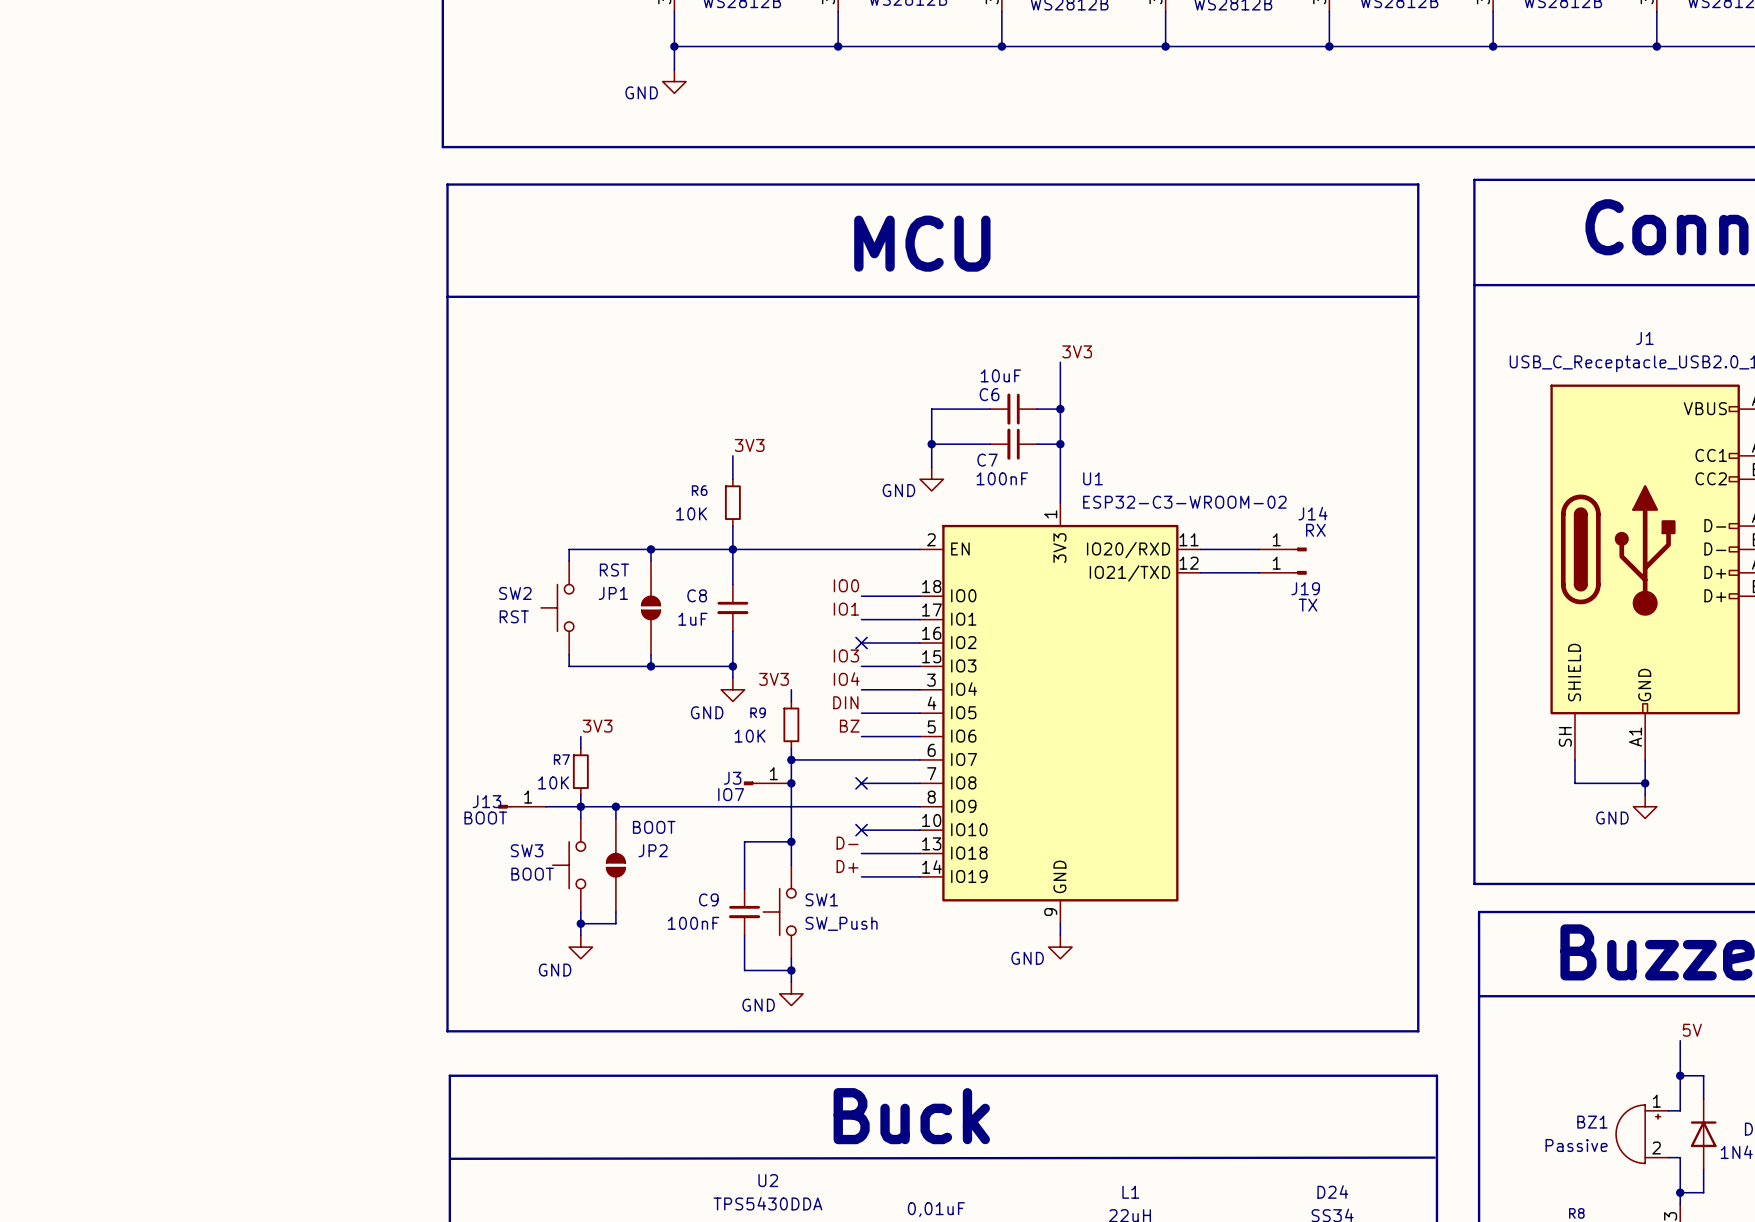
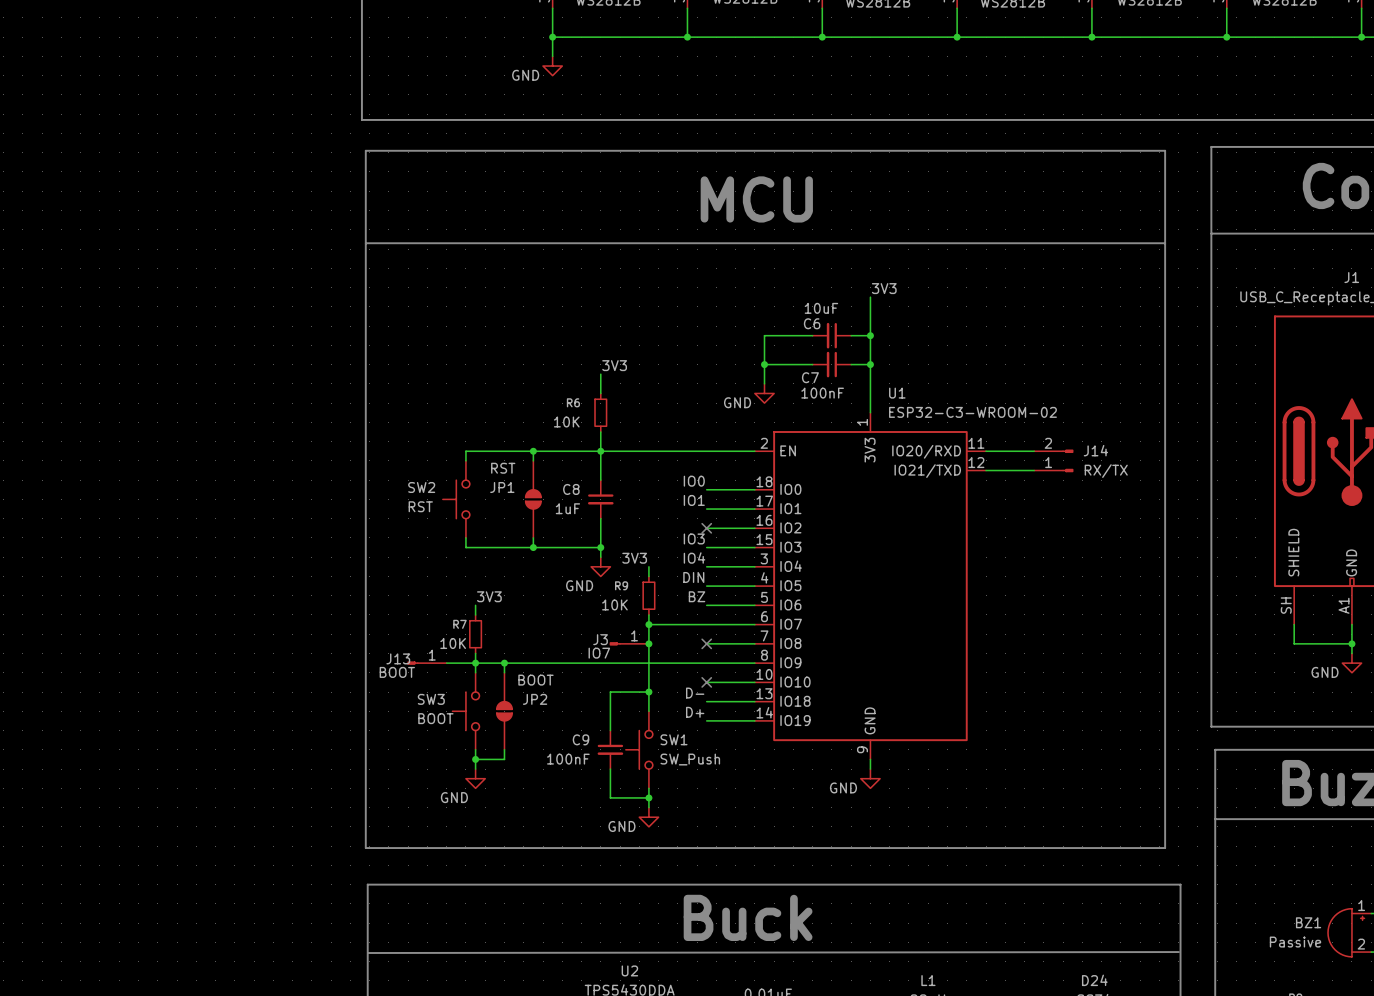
J14 name position: J14 (1312, 513) -> J14 (1095, 450)
J14 value: RX (1315, 530) -> RX/TX (1106, 471)
J14 symbol: [1259, 547, 1307, 552] -> [1034, 449, 1074, 473]
J19: TX (1282, 572) -> none

